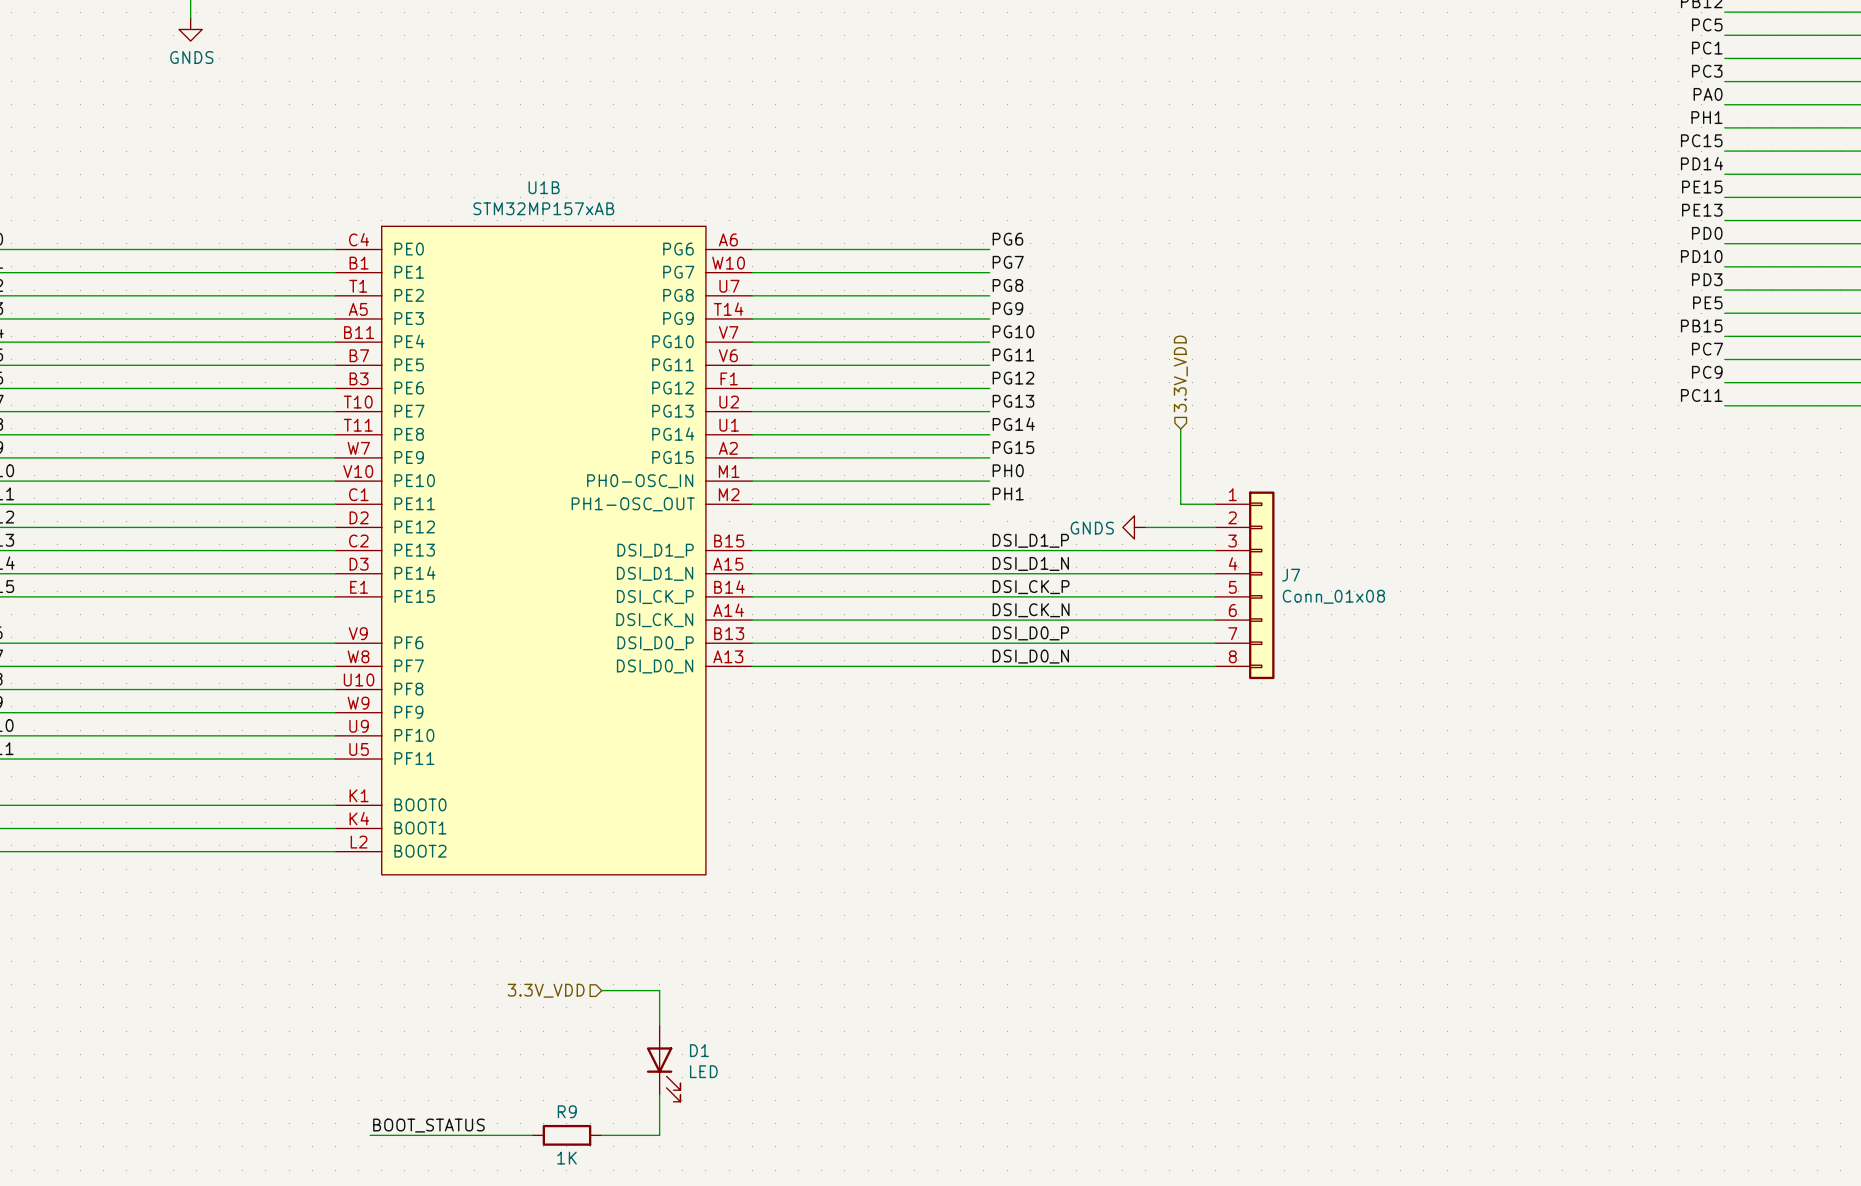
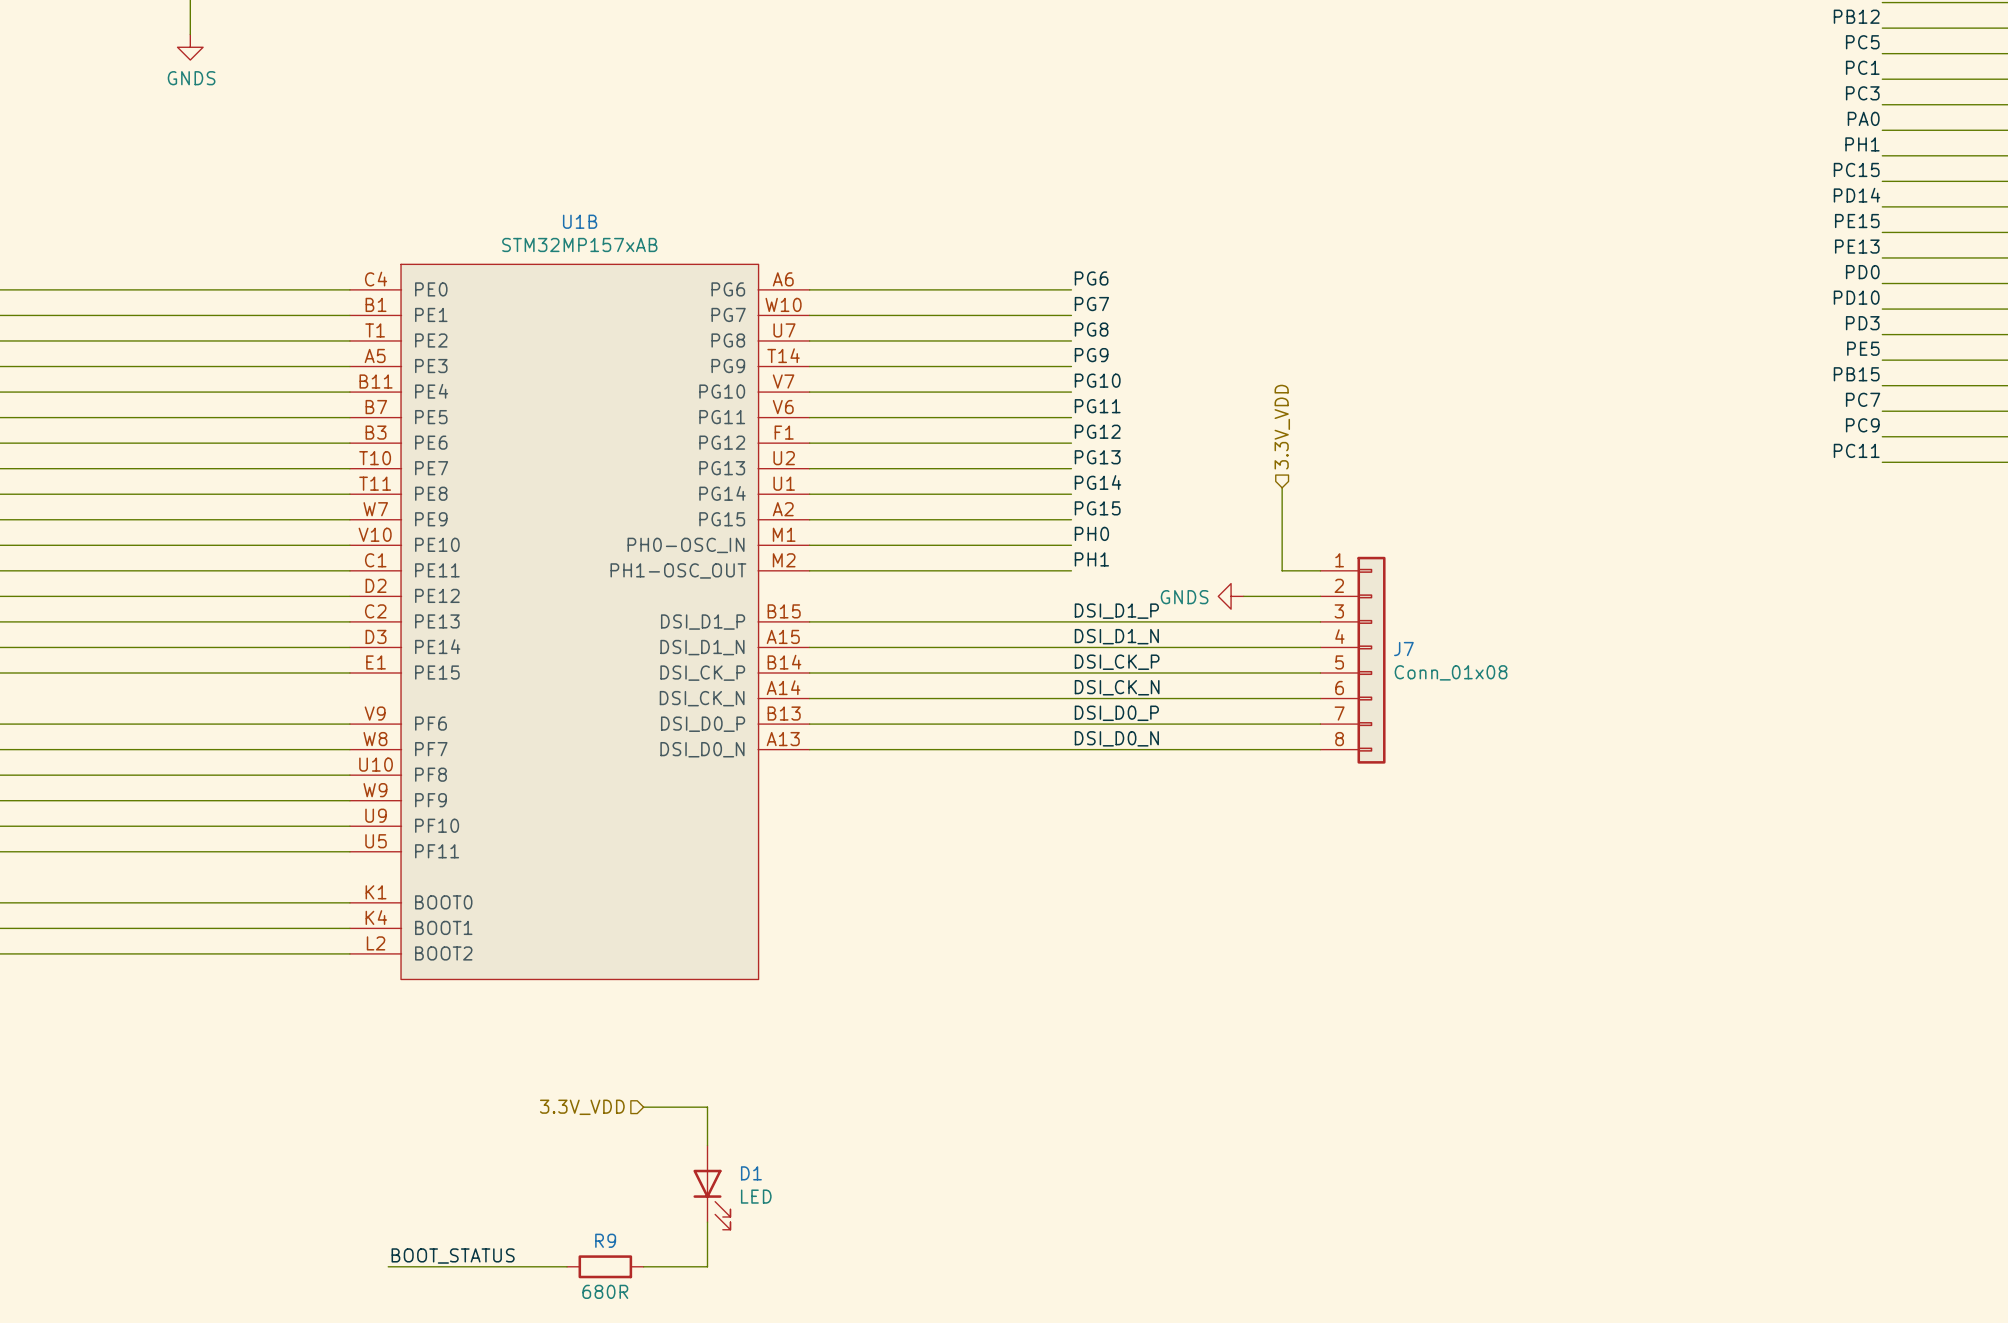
R9 value: 1K (566, 1158) -> 680R (605, 1291)

